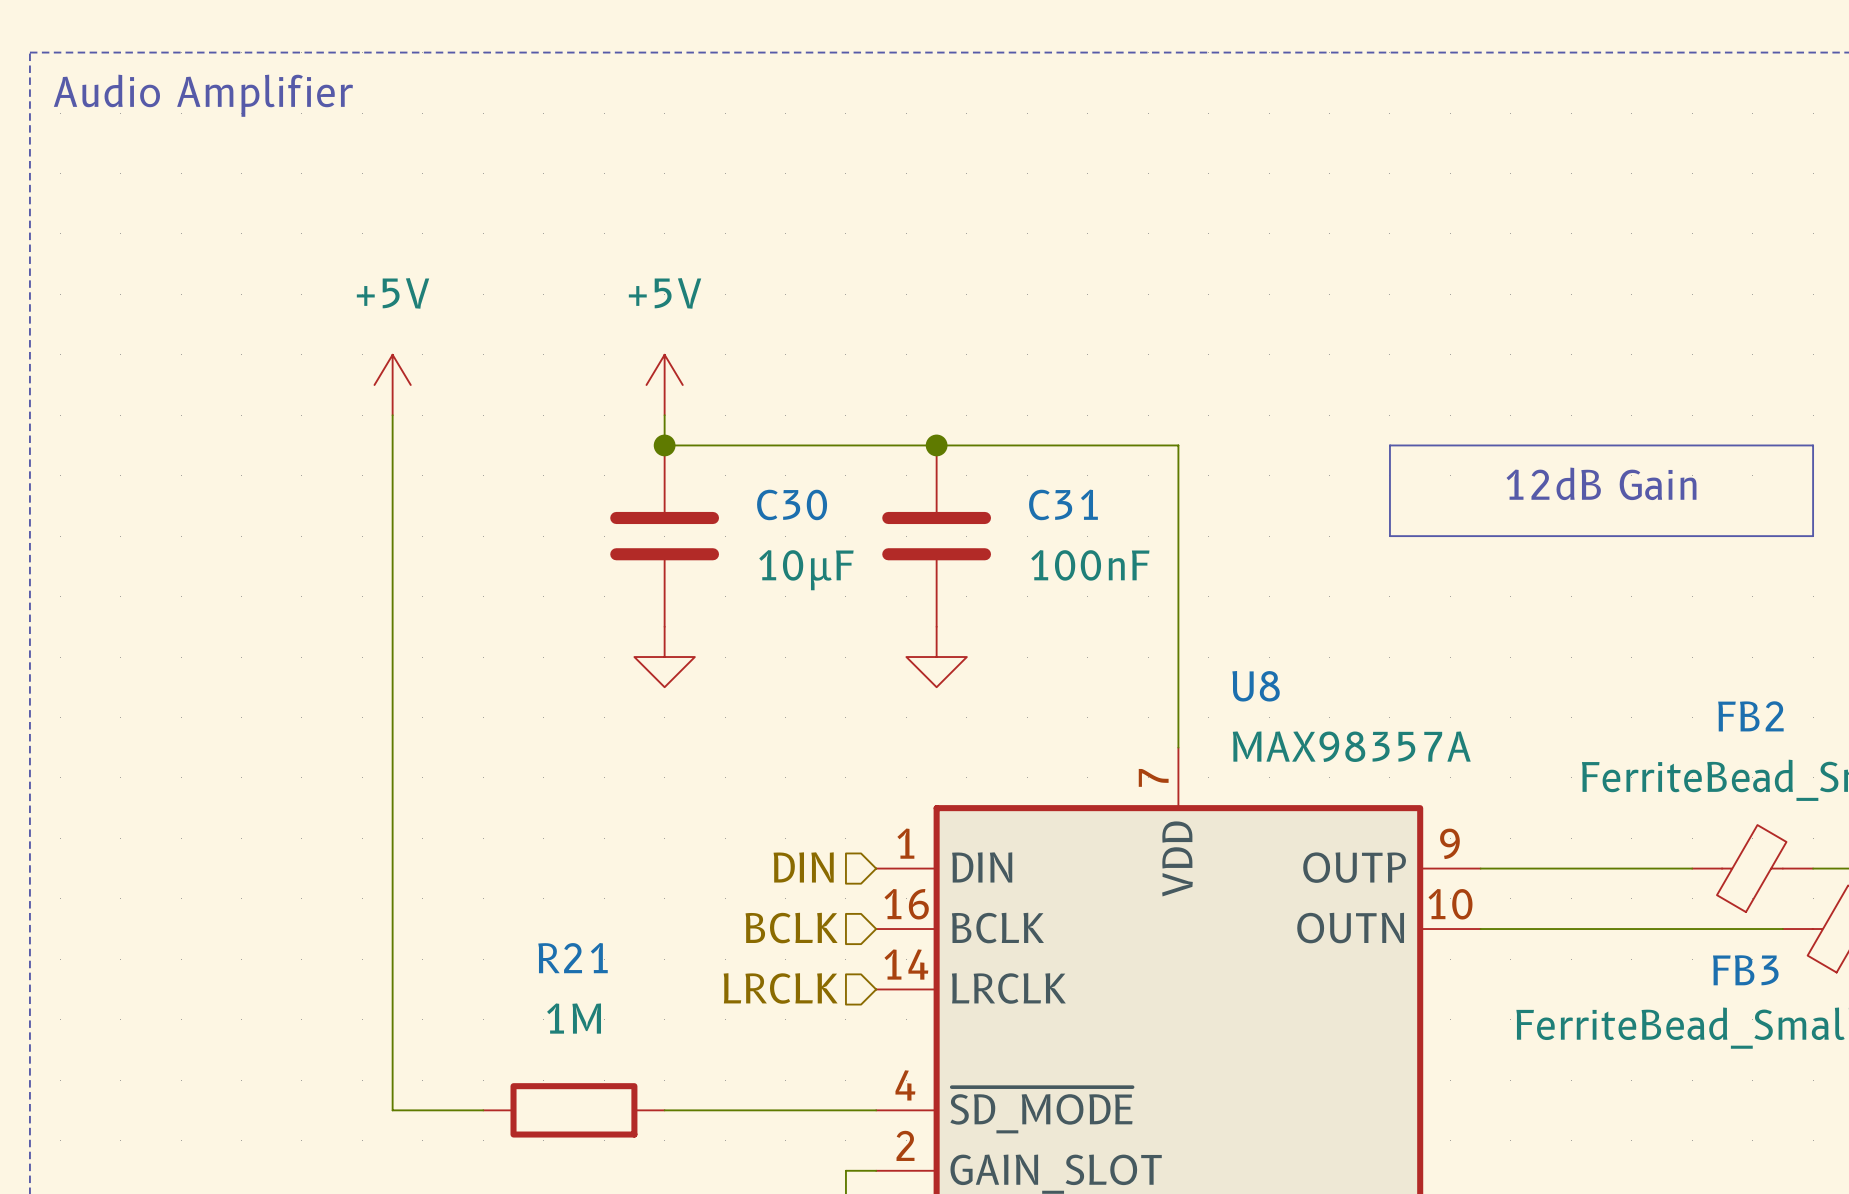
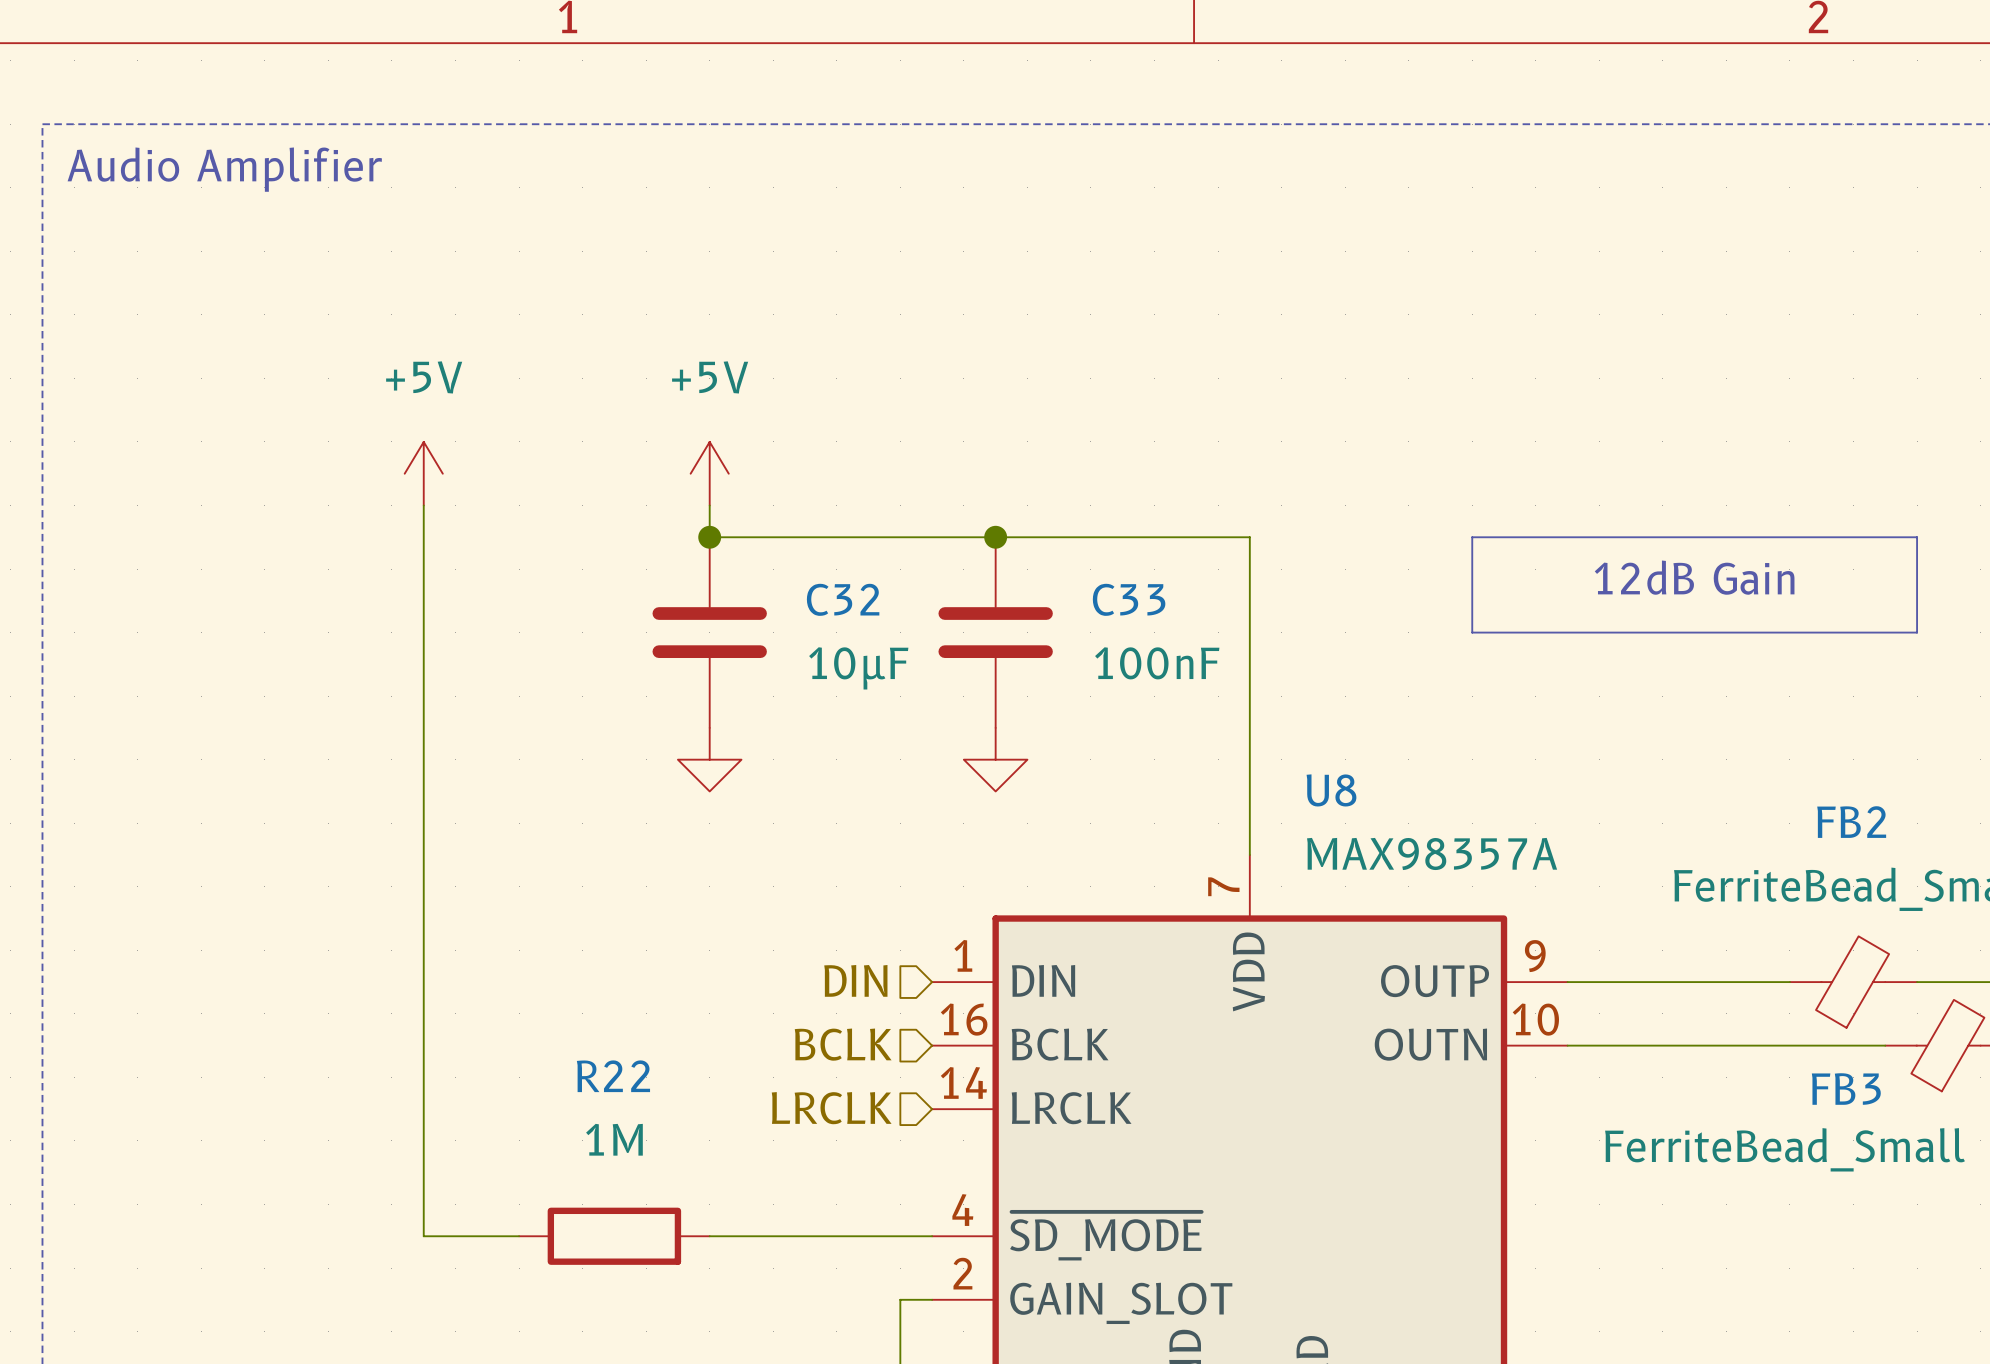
C30 name: C30 (792, 504) -> C32 (843, 599)
C31 name: C31 (1063, 504) -> C33 (1129, 599)
R21 name: R21 (573, 958) -> R22 (613, 1076)

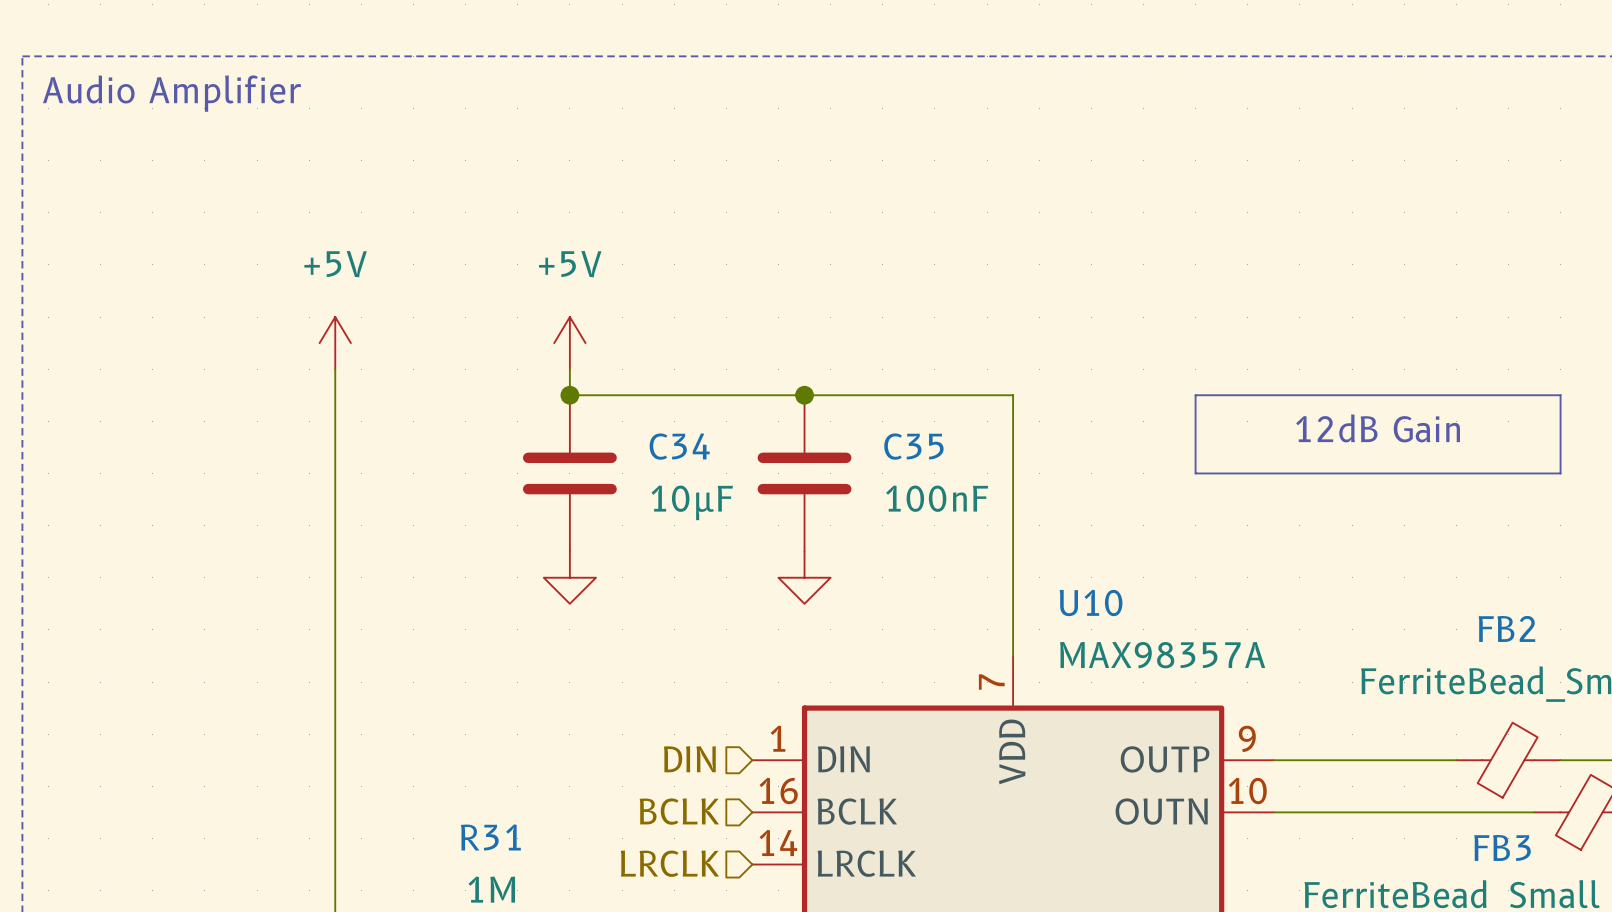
C32 name: C32 (843, 599) -> C34 (679, 446)
C33 name: C33 (1129, 599) -> C35 (913, 446)
U8 name: U8 (1331, 790) -> U10 (1091, 602)
R22 name: R22 (613, 1076) -> R31 (490, 837)

